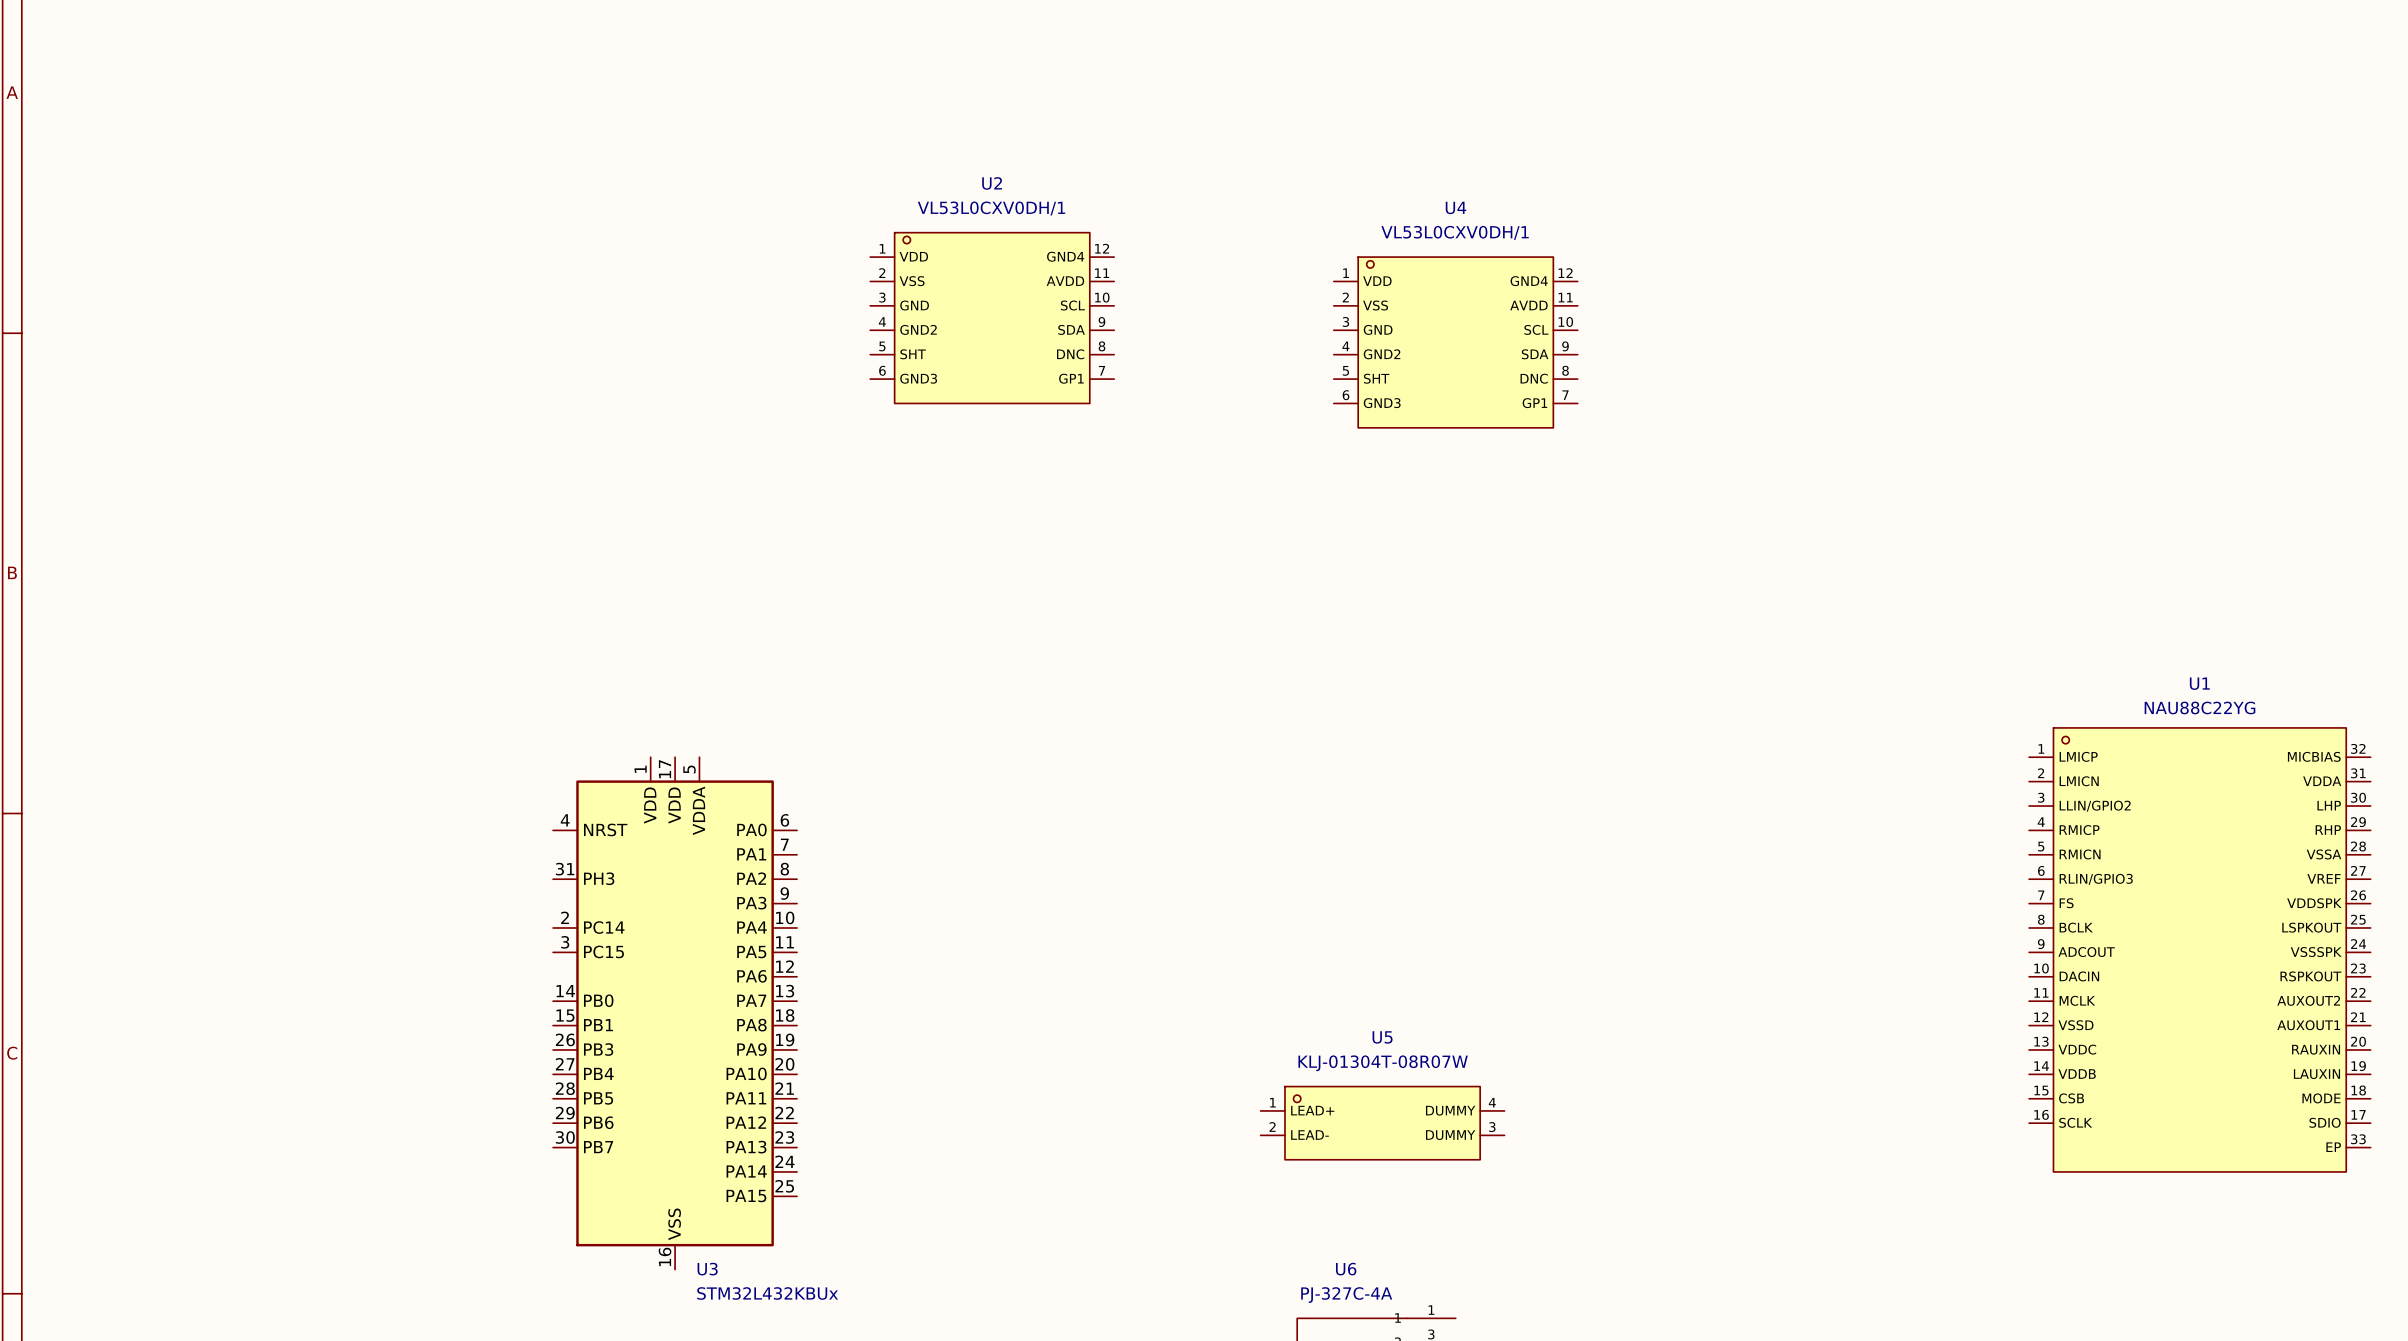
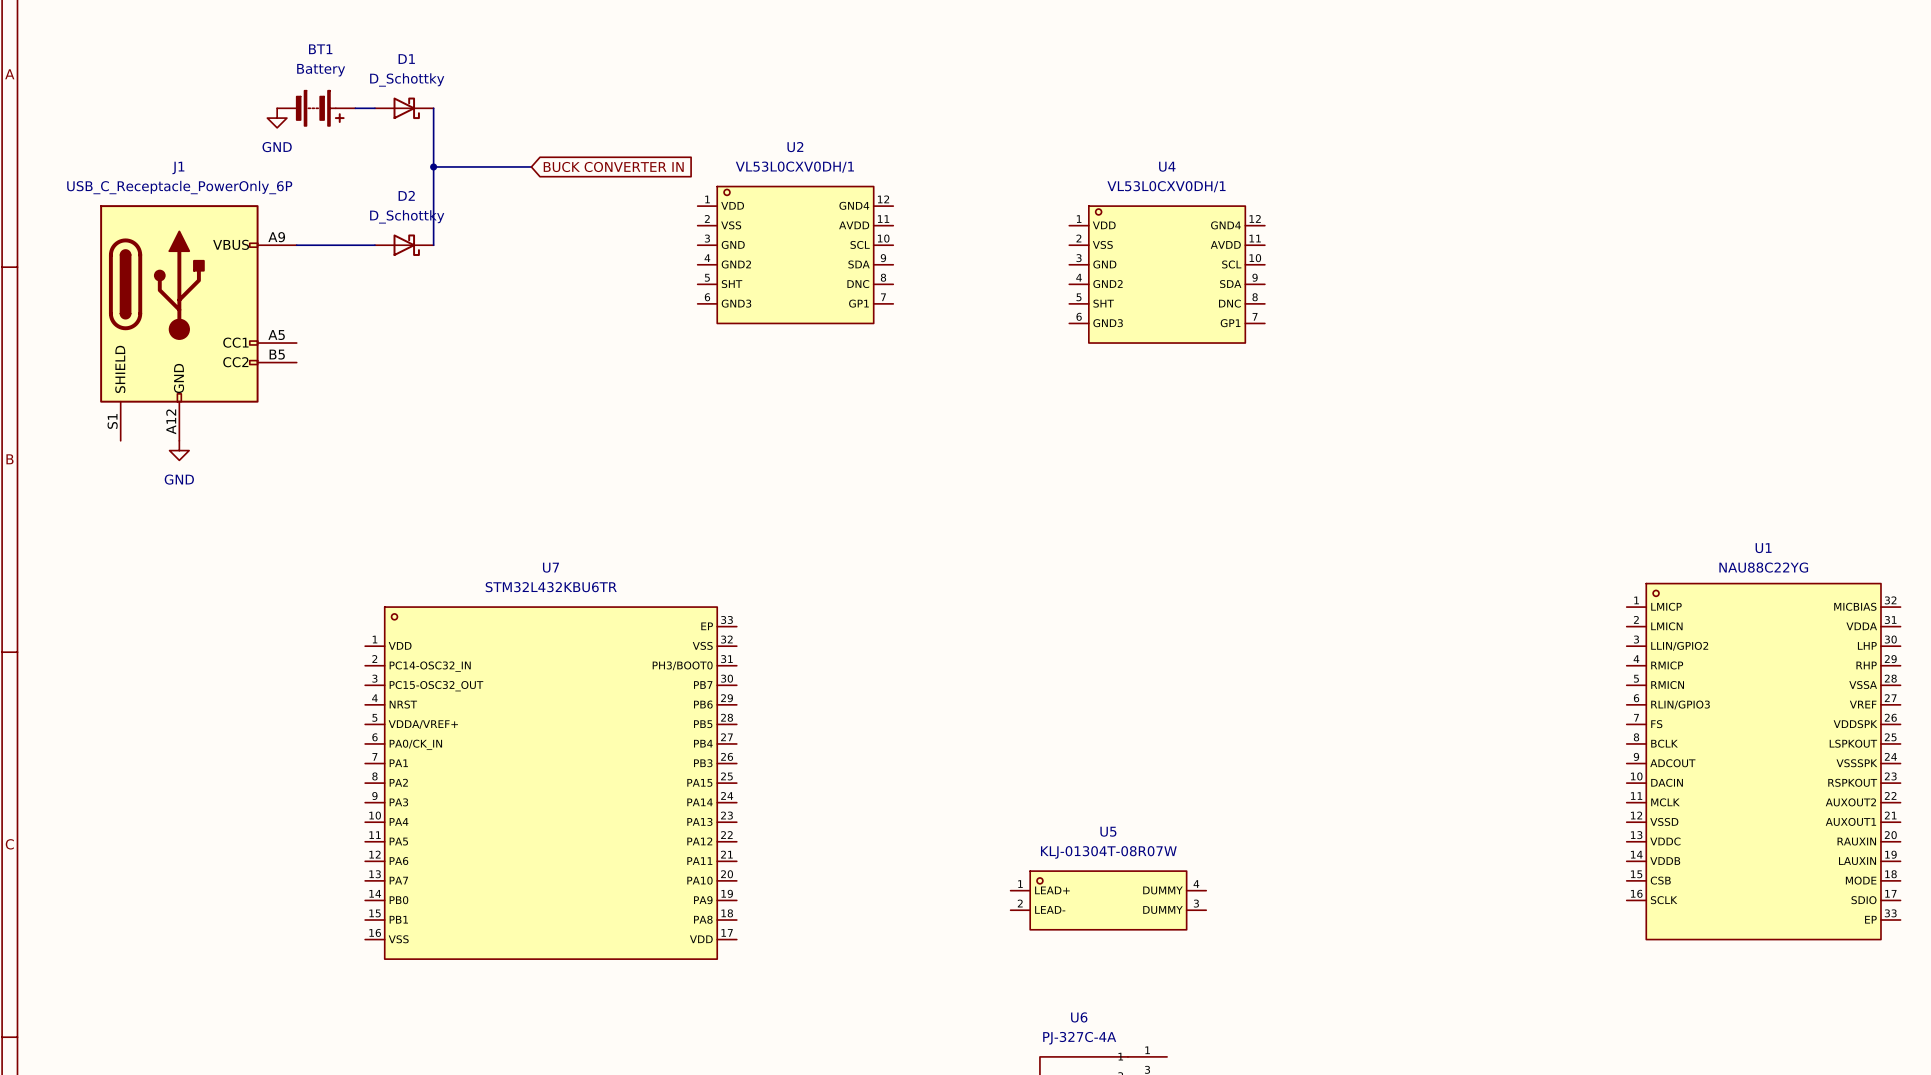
BT1: none -> Battery (316, 108)
wire: none -> (355, 108) (374, 108)
D1: none -> D_Schottky (404, 108)
wire: none -> (433, 108) (433, 245)
power symbol: none -> GND (277, 118)
wire: none -> (433, 166) (531, 166)
junction: none -> (433, 166)
global label: none -> BUCK CONVERTER IN (613, 166)
wire: none -> (296, 245) (374, 245)
D2: none -> D_Schottky (404, 245)
J1: none -> USB_C_Receptacle_PowerOnly_6P (198, 322)
power symbol: none -> GND (179, 450)
U7: none -> STM32L432KBU6TR (550, 783)
U3: STM32L432KBUx (675, 1013) -> none

